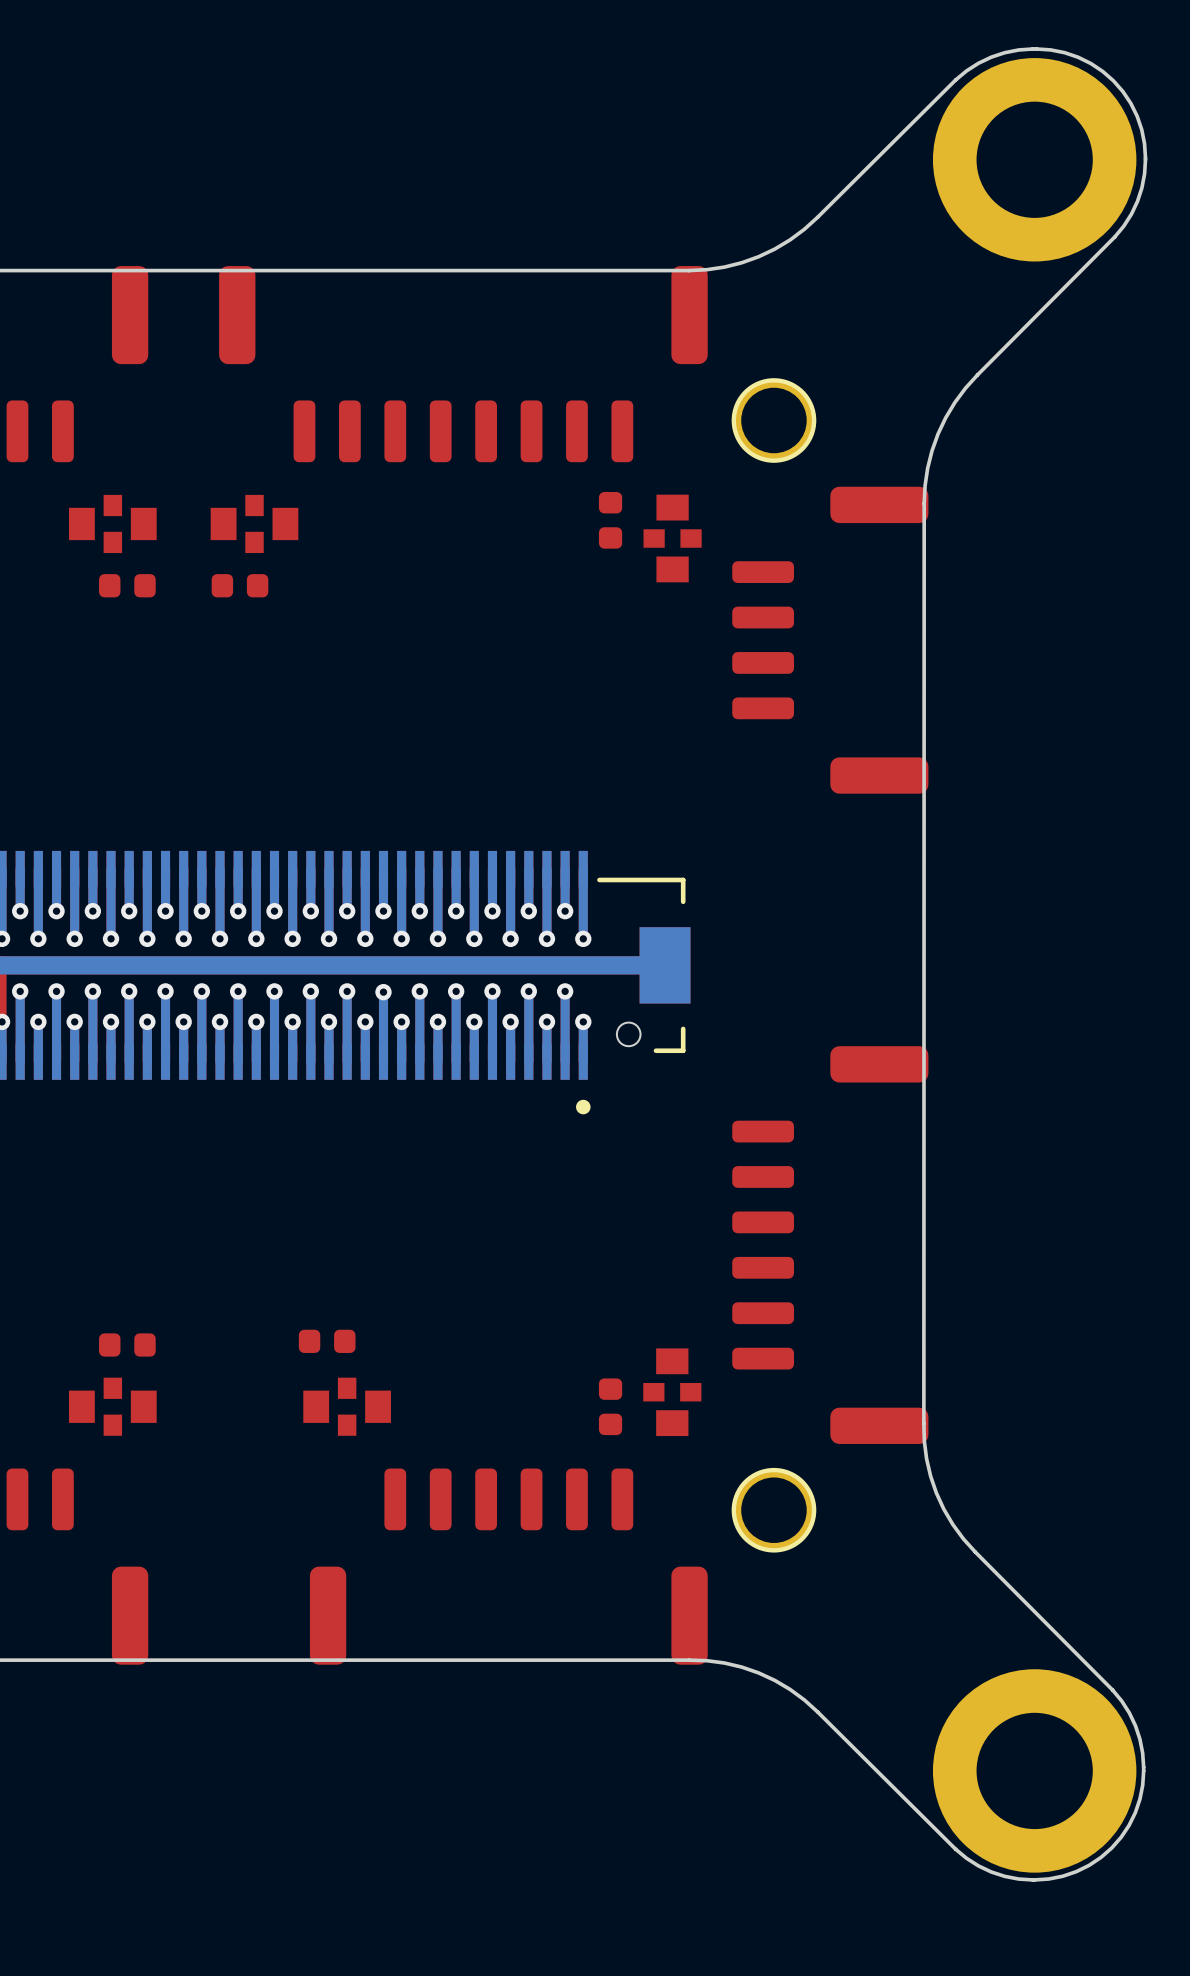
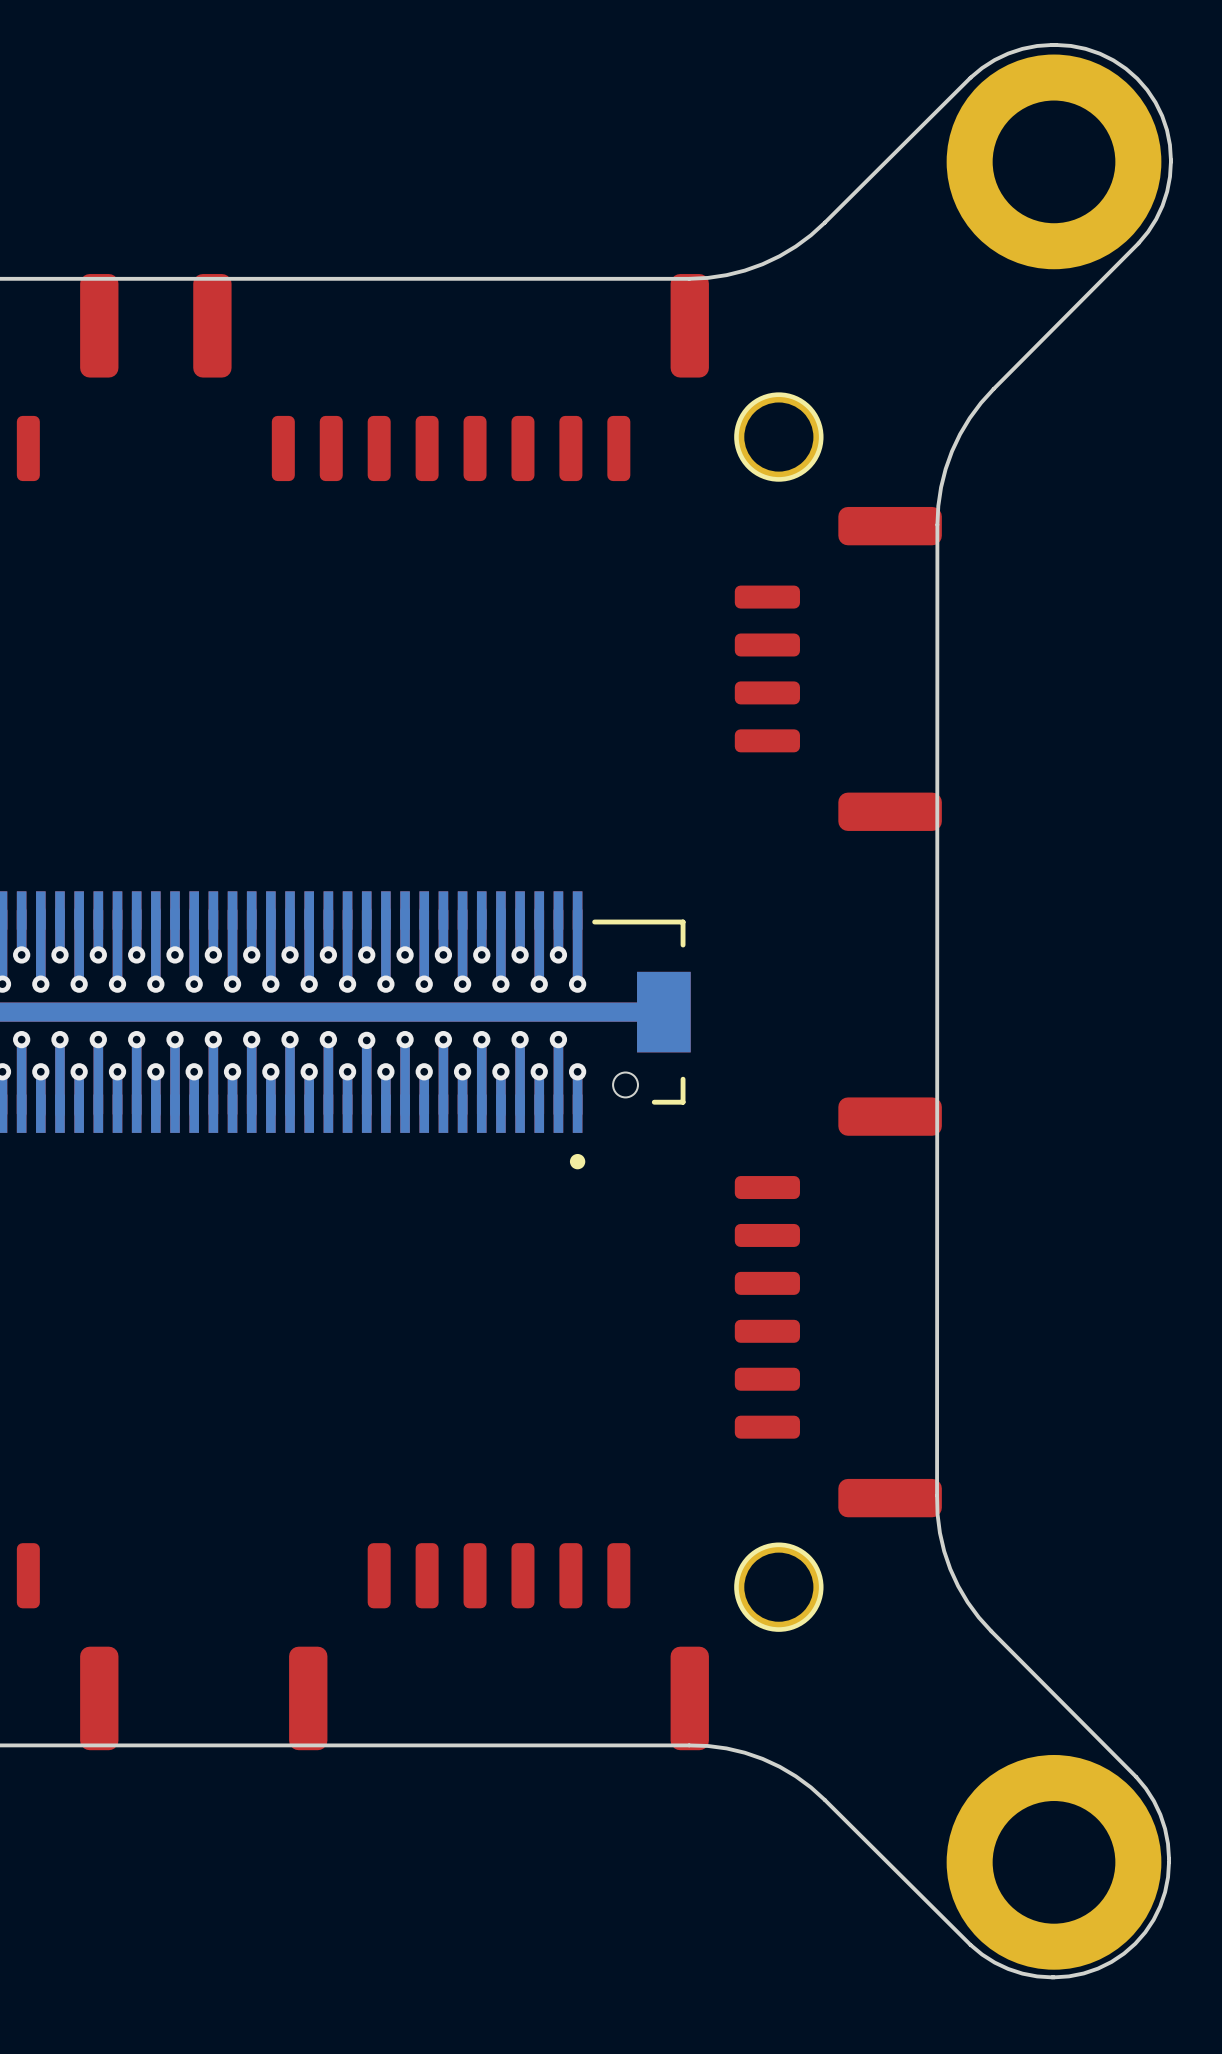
part: (610, 520) -> none
part: (112, 523) -> none
part: (254, 523) -> none
part: (672, 538) -> none
part: (127, 585) -> none
part: (239, 585) -> none
part: (327, 1341) -> none
part: (127, 1344) -> none
part: (672, 1392) -> none
part: (112, 1406) -> none
part: (347, 1406) -> none
part: (610, 1406) -> none

